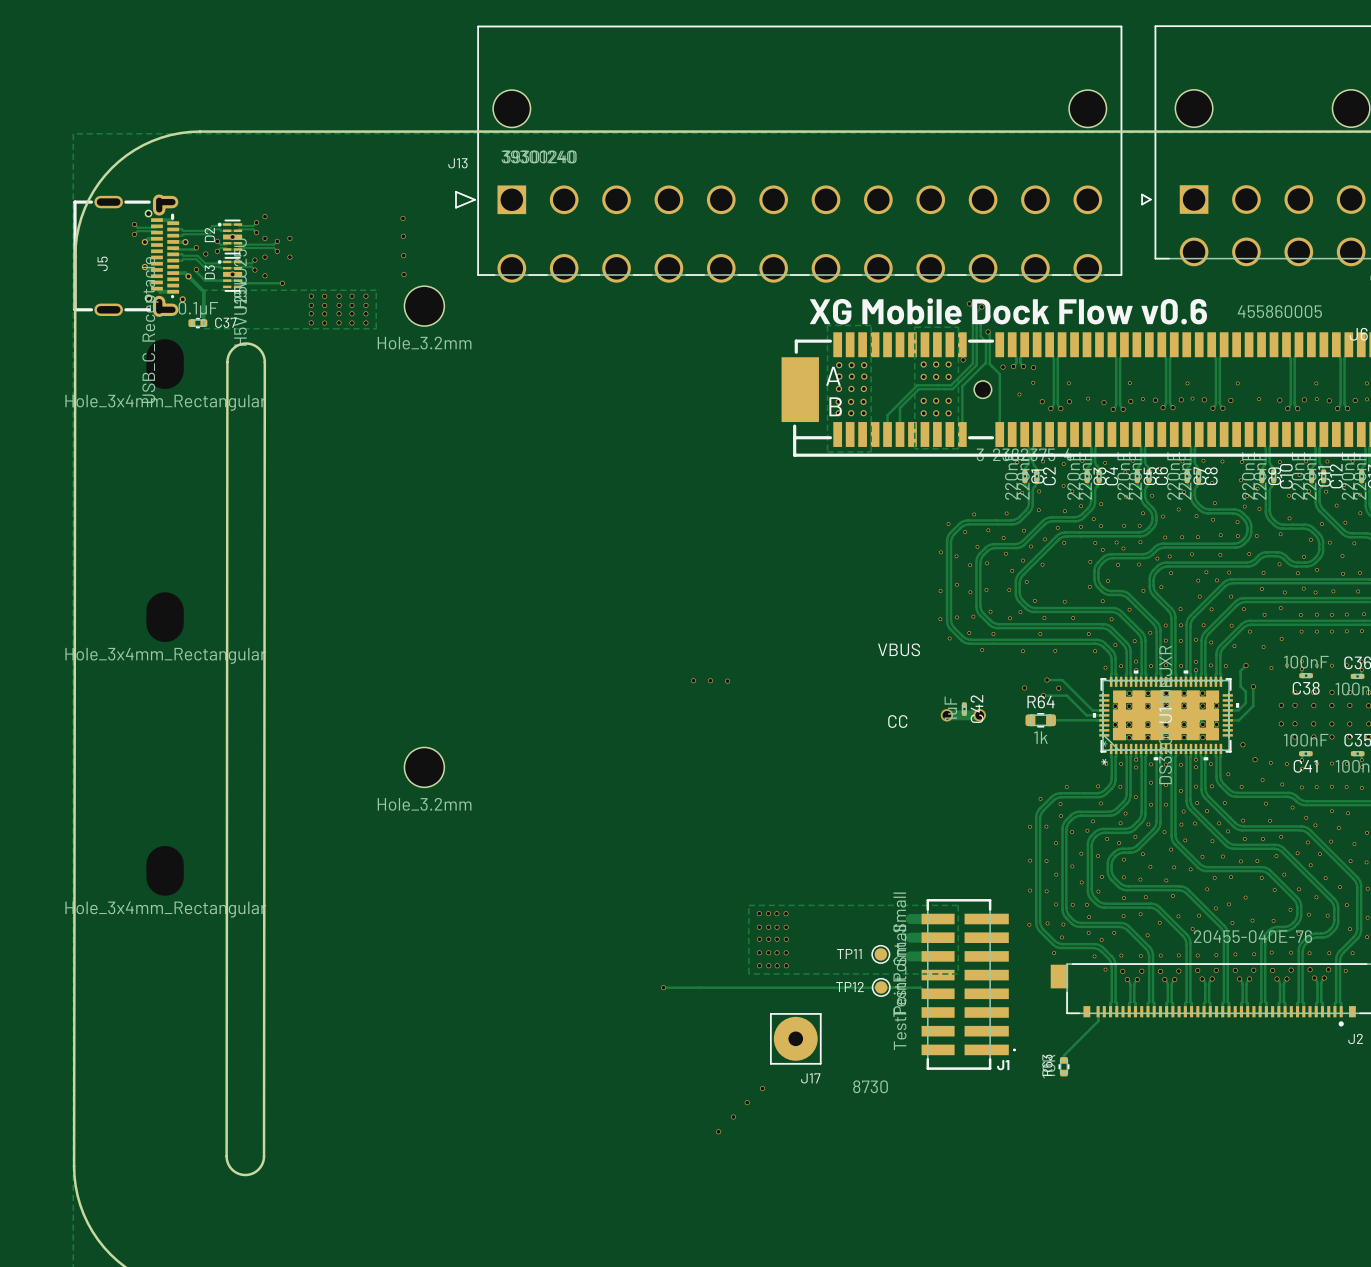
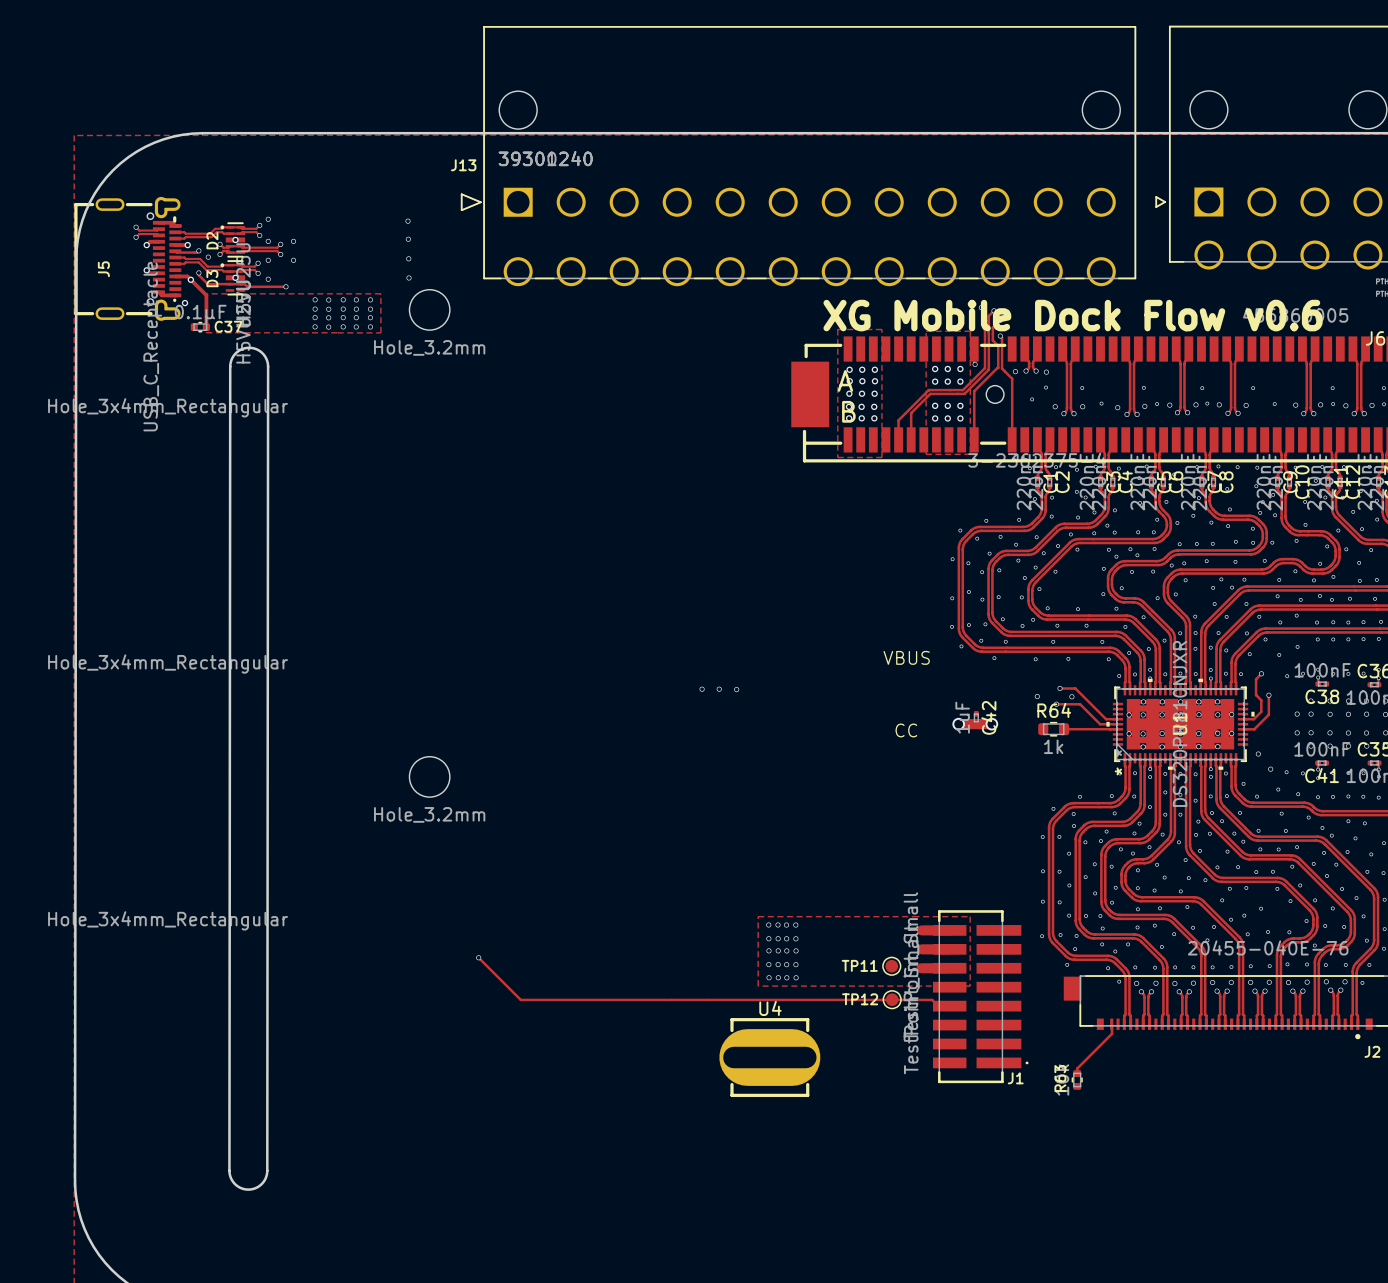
track: none -> (478, 957) (520, 999) (671, 999)
via: none -> (478, 957)
via: (663, 987) -> none
J17: 8730 (795, 1038) -> none
U4: none -> (769, 1057)
via: (762, 1088) -> none
via: (747, 1102) -> none
via: (733, 1116) -> none
via: (718, 1131) -> none

